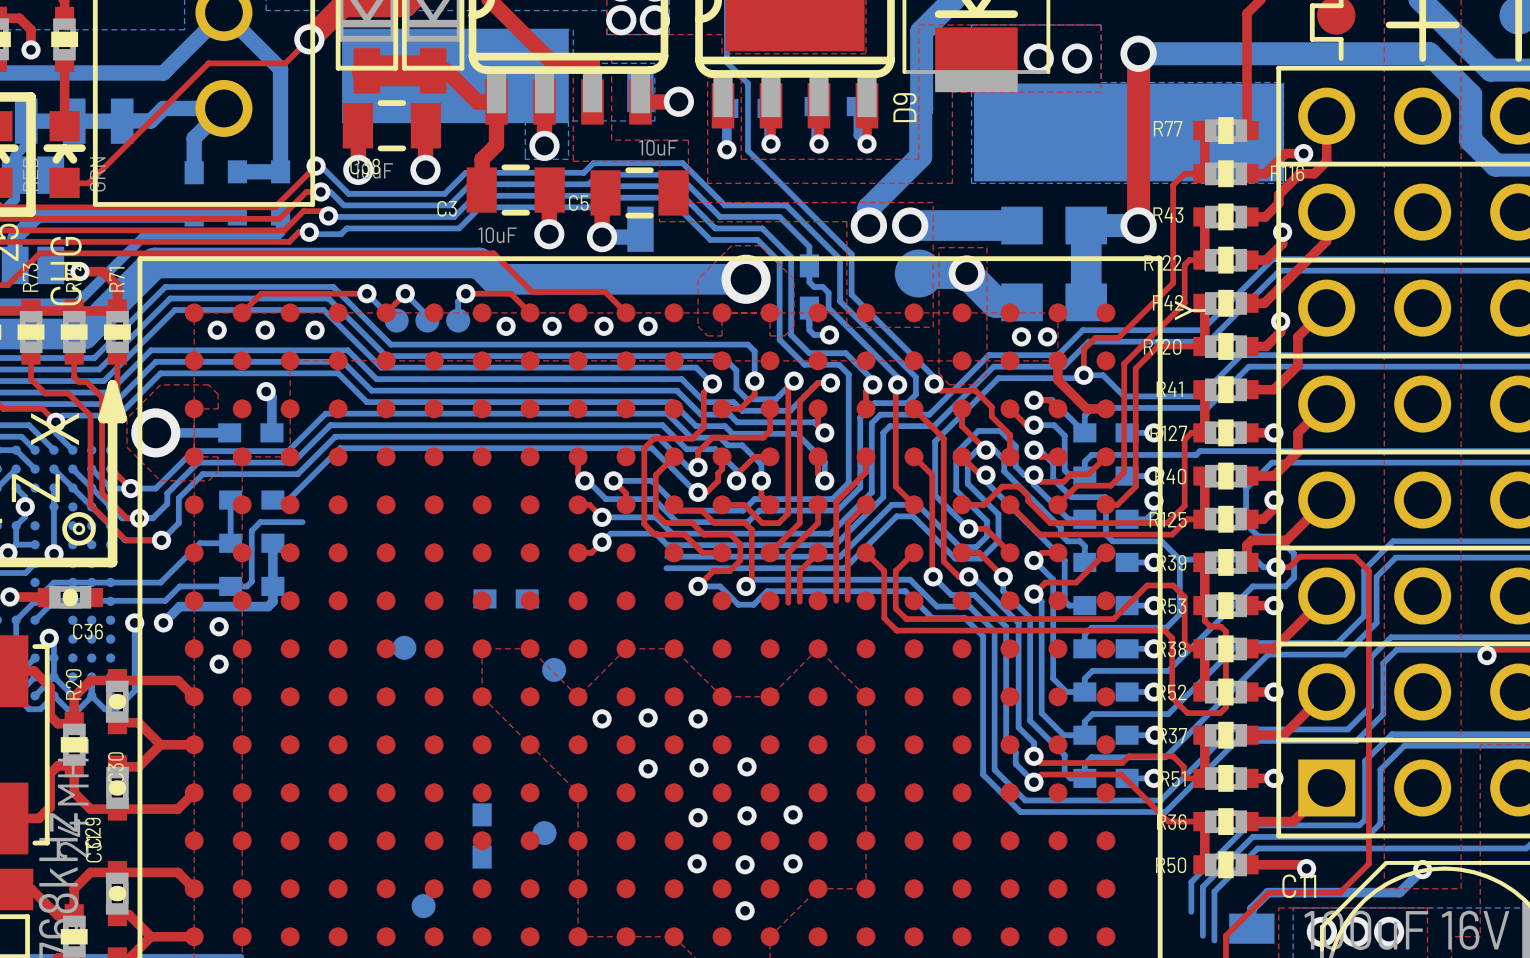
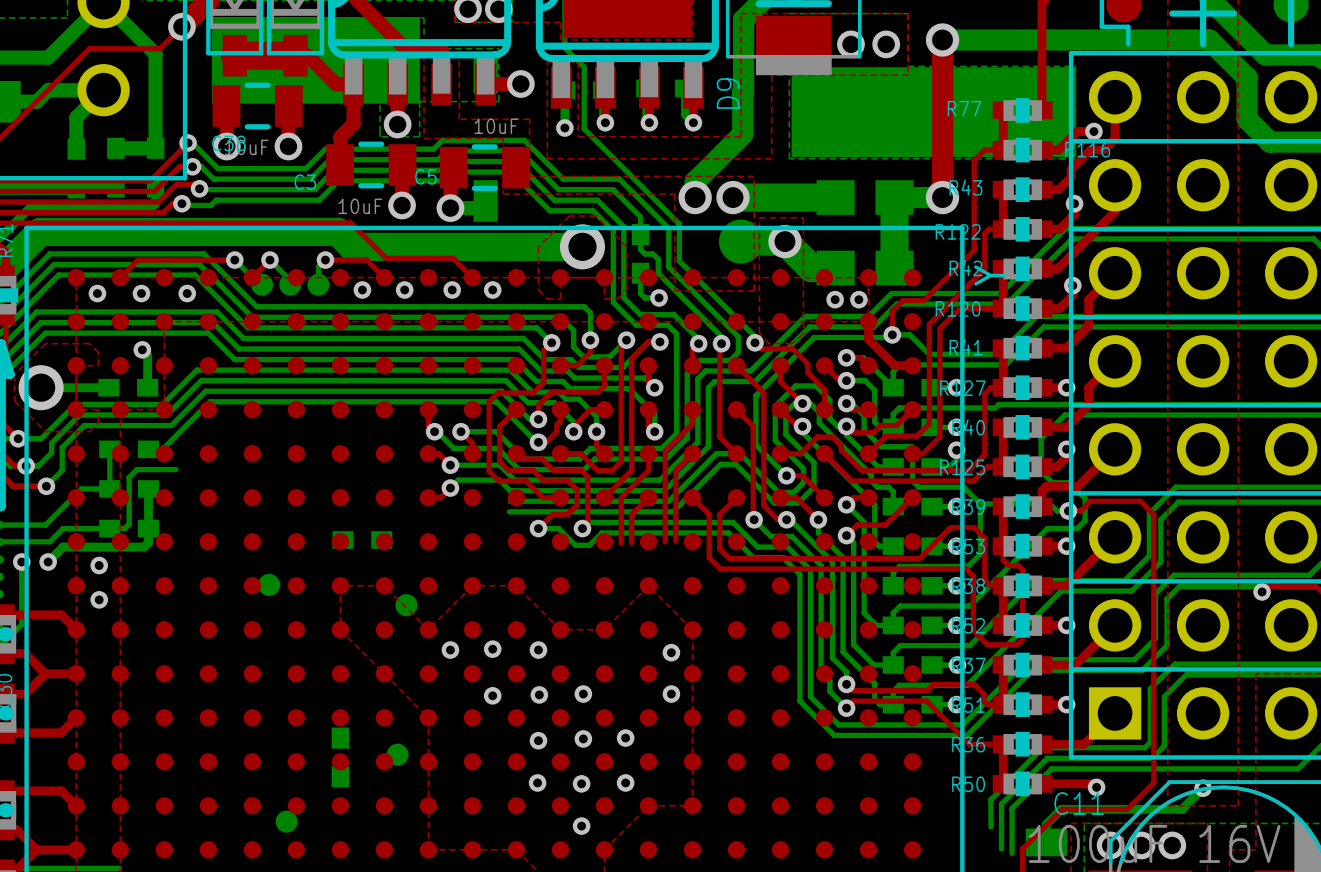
via: none -> (671, 652)
via: none -> (671, 694)

